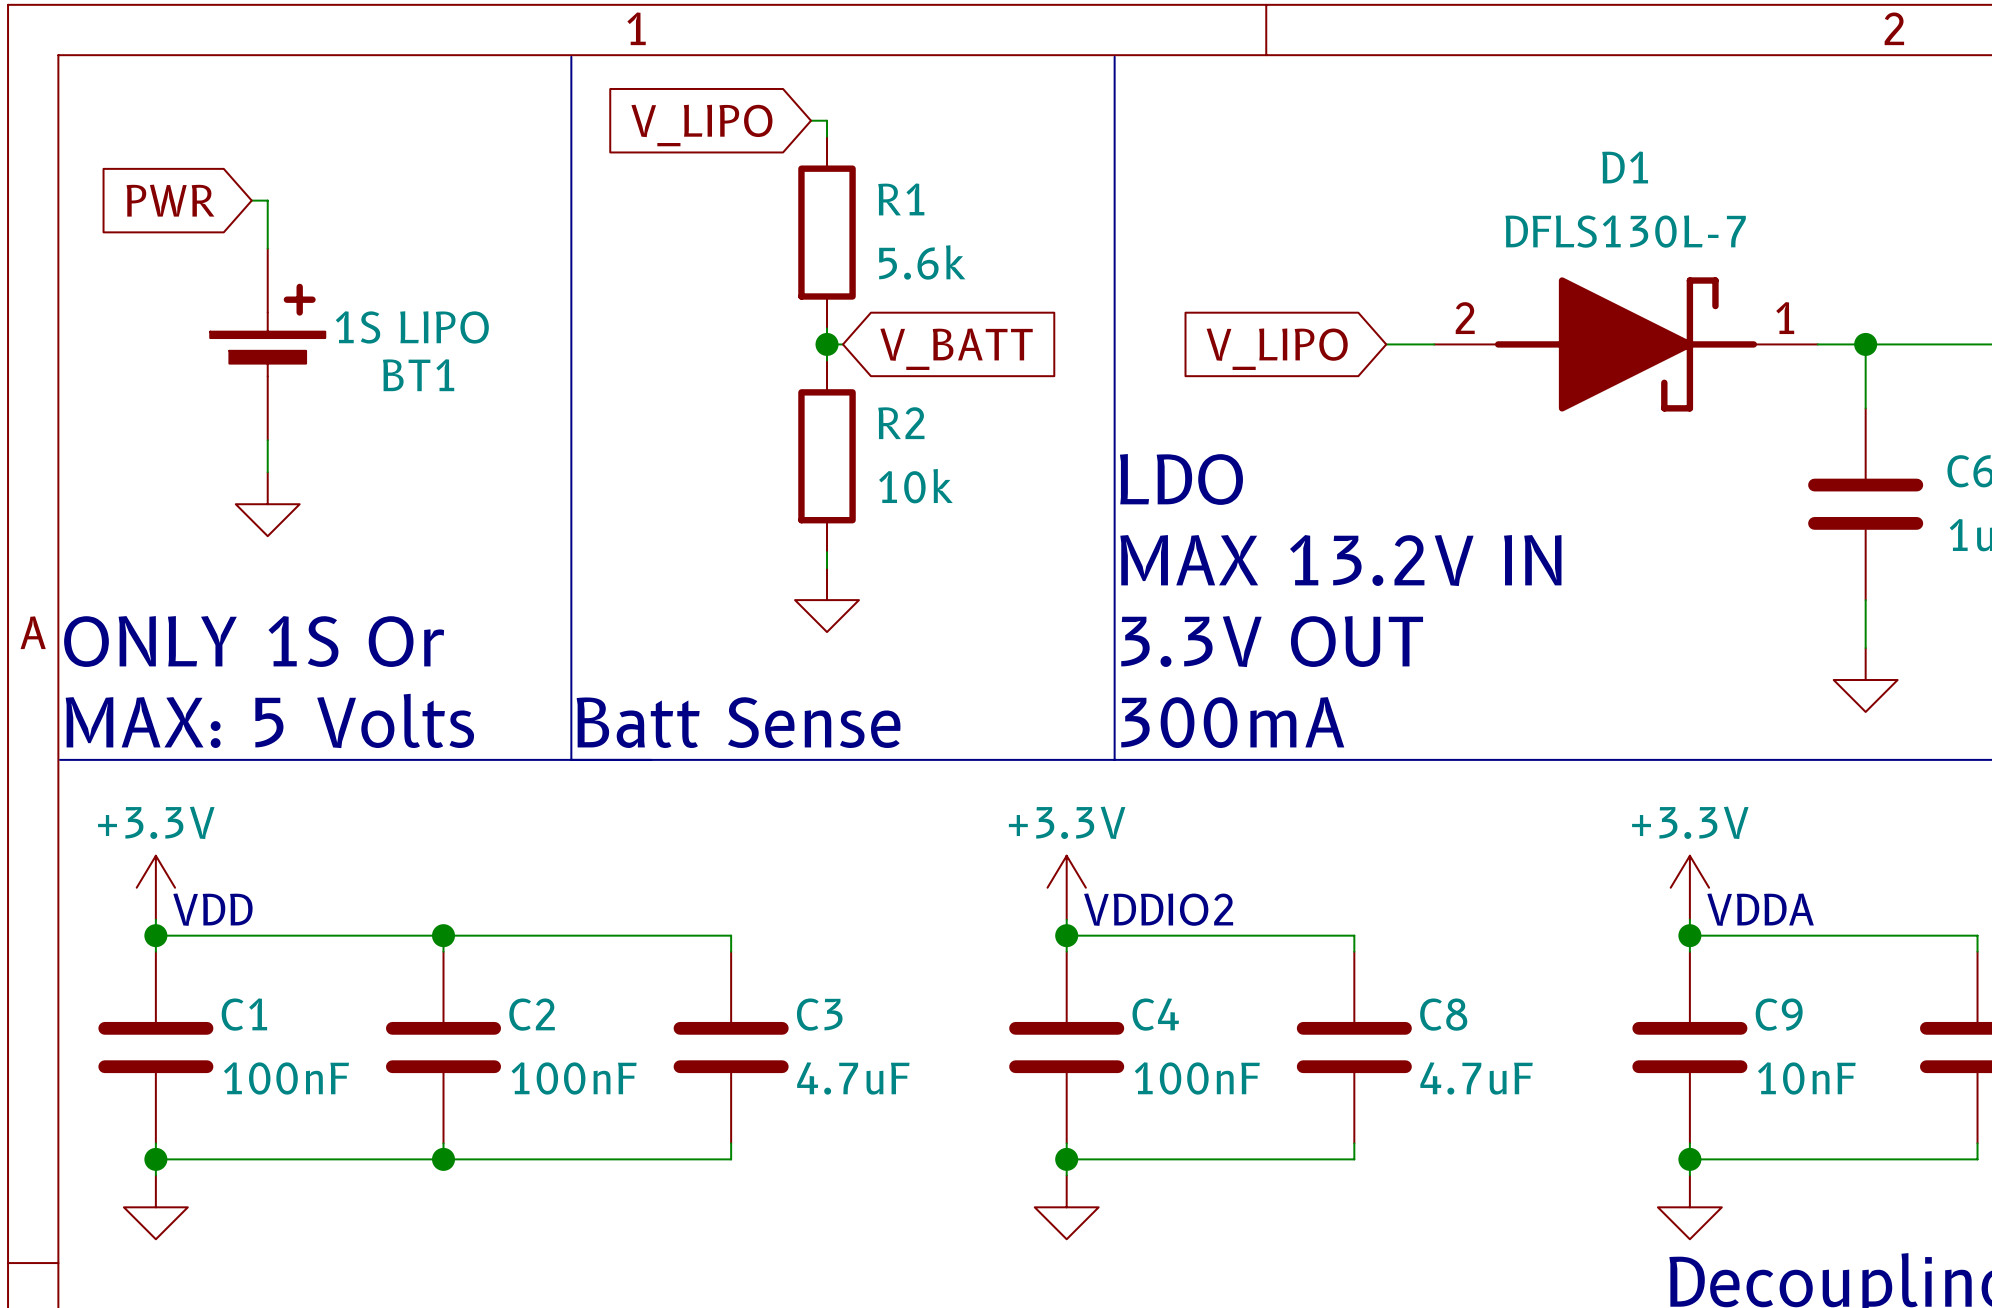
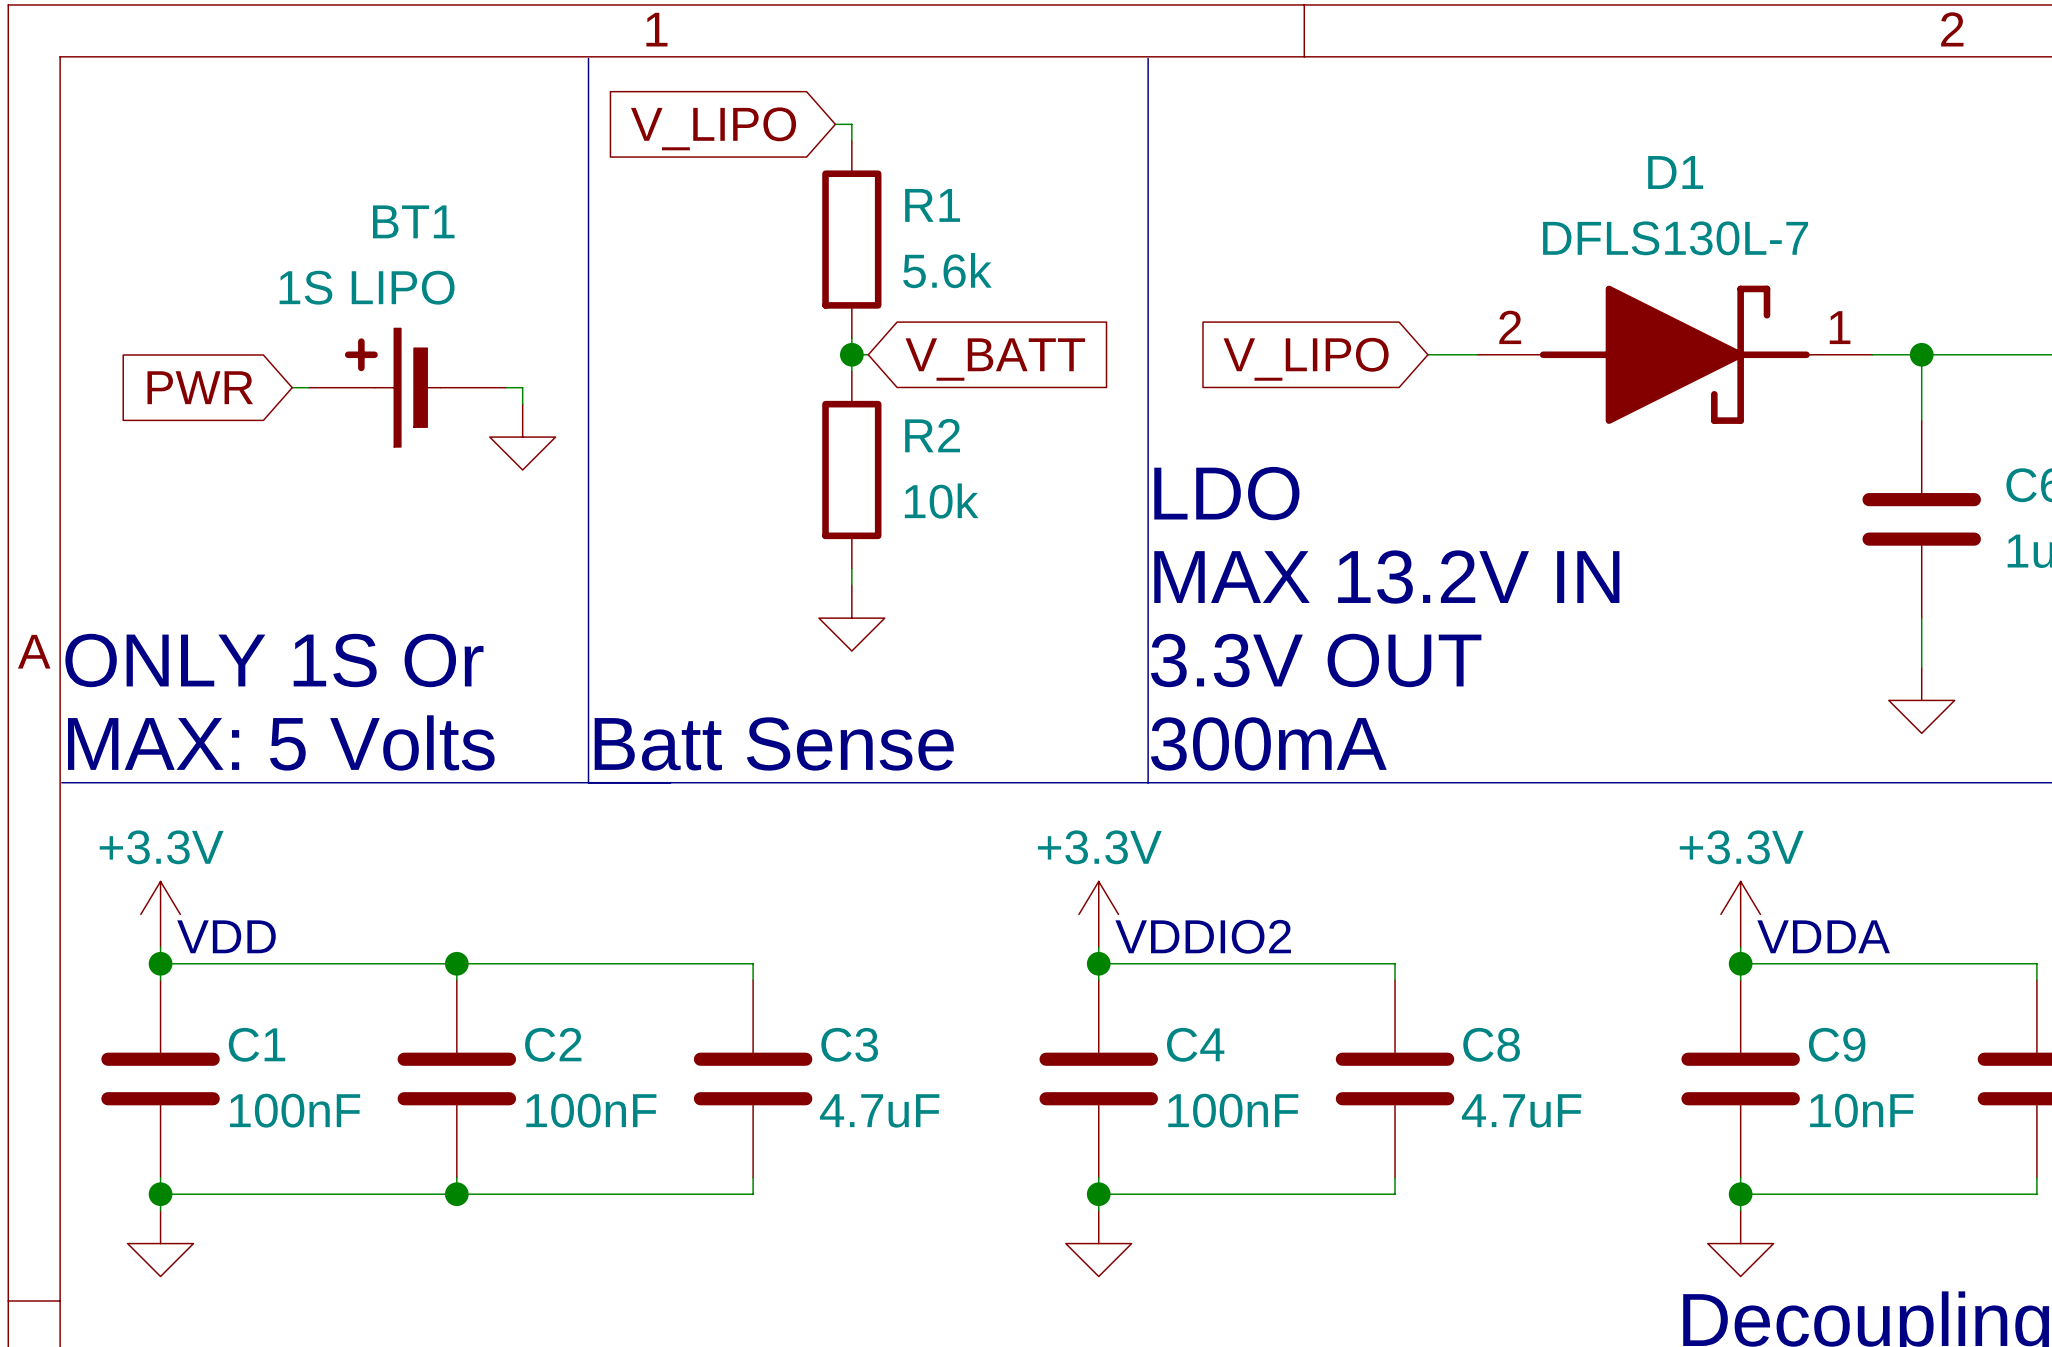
global label position: PWR (170, 200) -> PWR (200, 387)
wire: (251, 200) (267, 200) (267, 248) -> none
BT1 value position: 1S LIPO (412, 327) -> 1S LIPO (367, 287)
BT1 rotation: 0° (267, 330) -> 90° counterclockwise (392, 387)
BT1 position: (267, 344) -> (407, 387)
wire: none -> (292, 387) (308, 387)
wire: none -> (506, 387) (522, 387) (522, 404)
wire: (267, 440) (267, 472) -> none
power symbol position: (267, 504) -> (522, 437)

